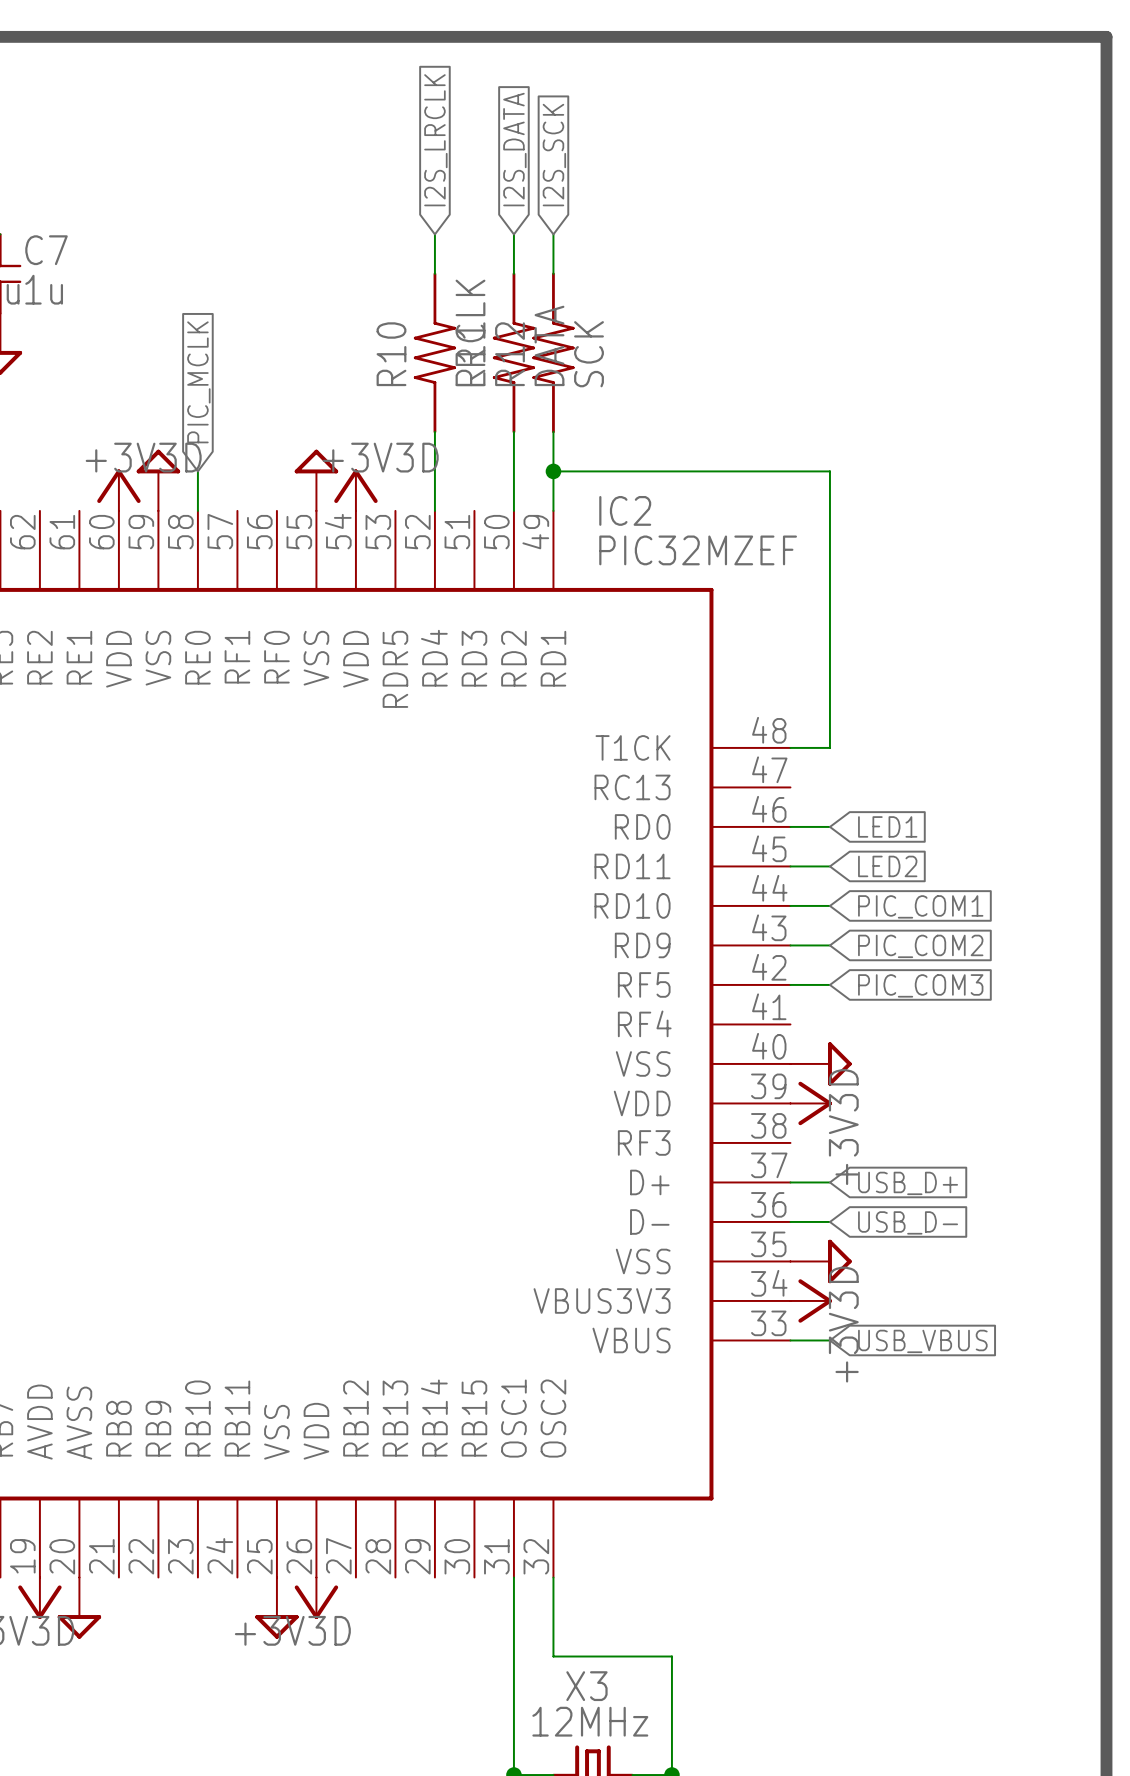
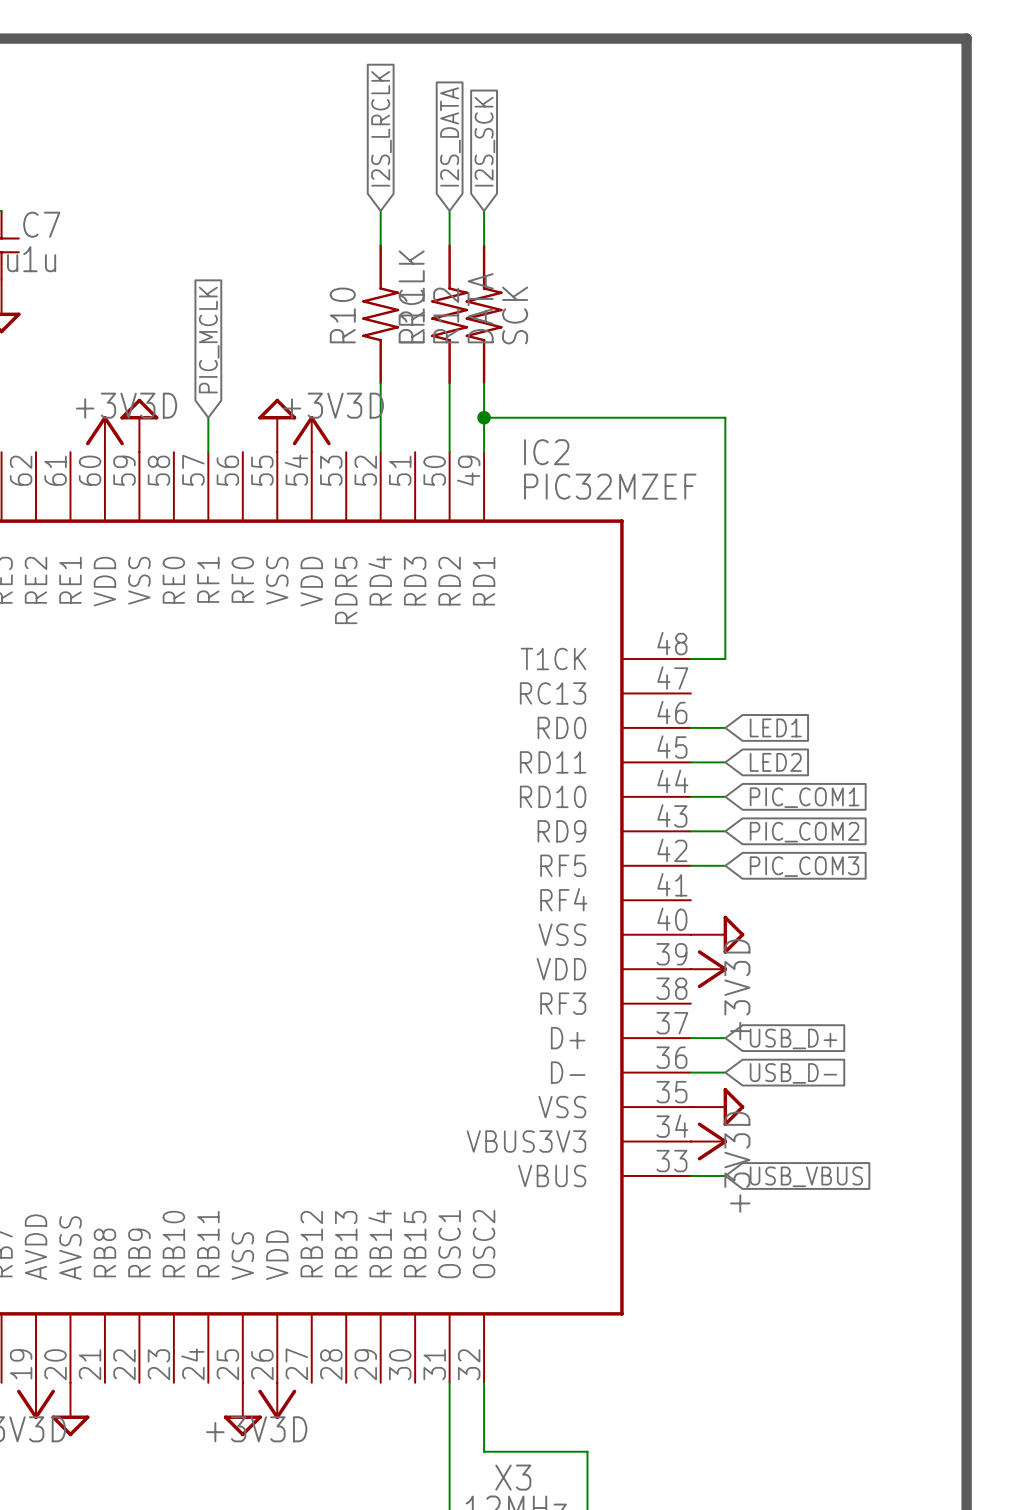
global label position: PIC_MCLK (198, 382) -> PIC_MCLK (209, 340)
wire: (197, 471) (197, 510) -> (208, 417) (208, 452)

